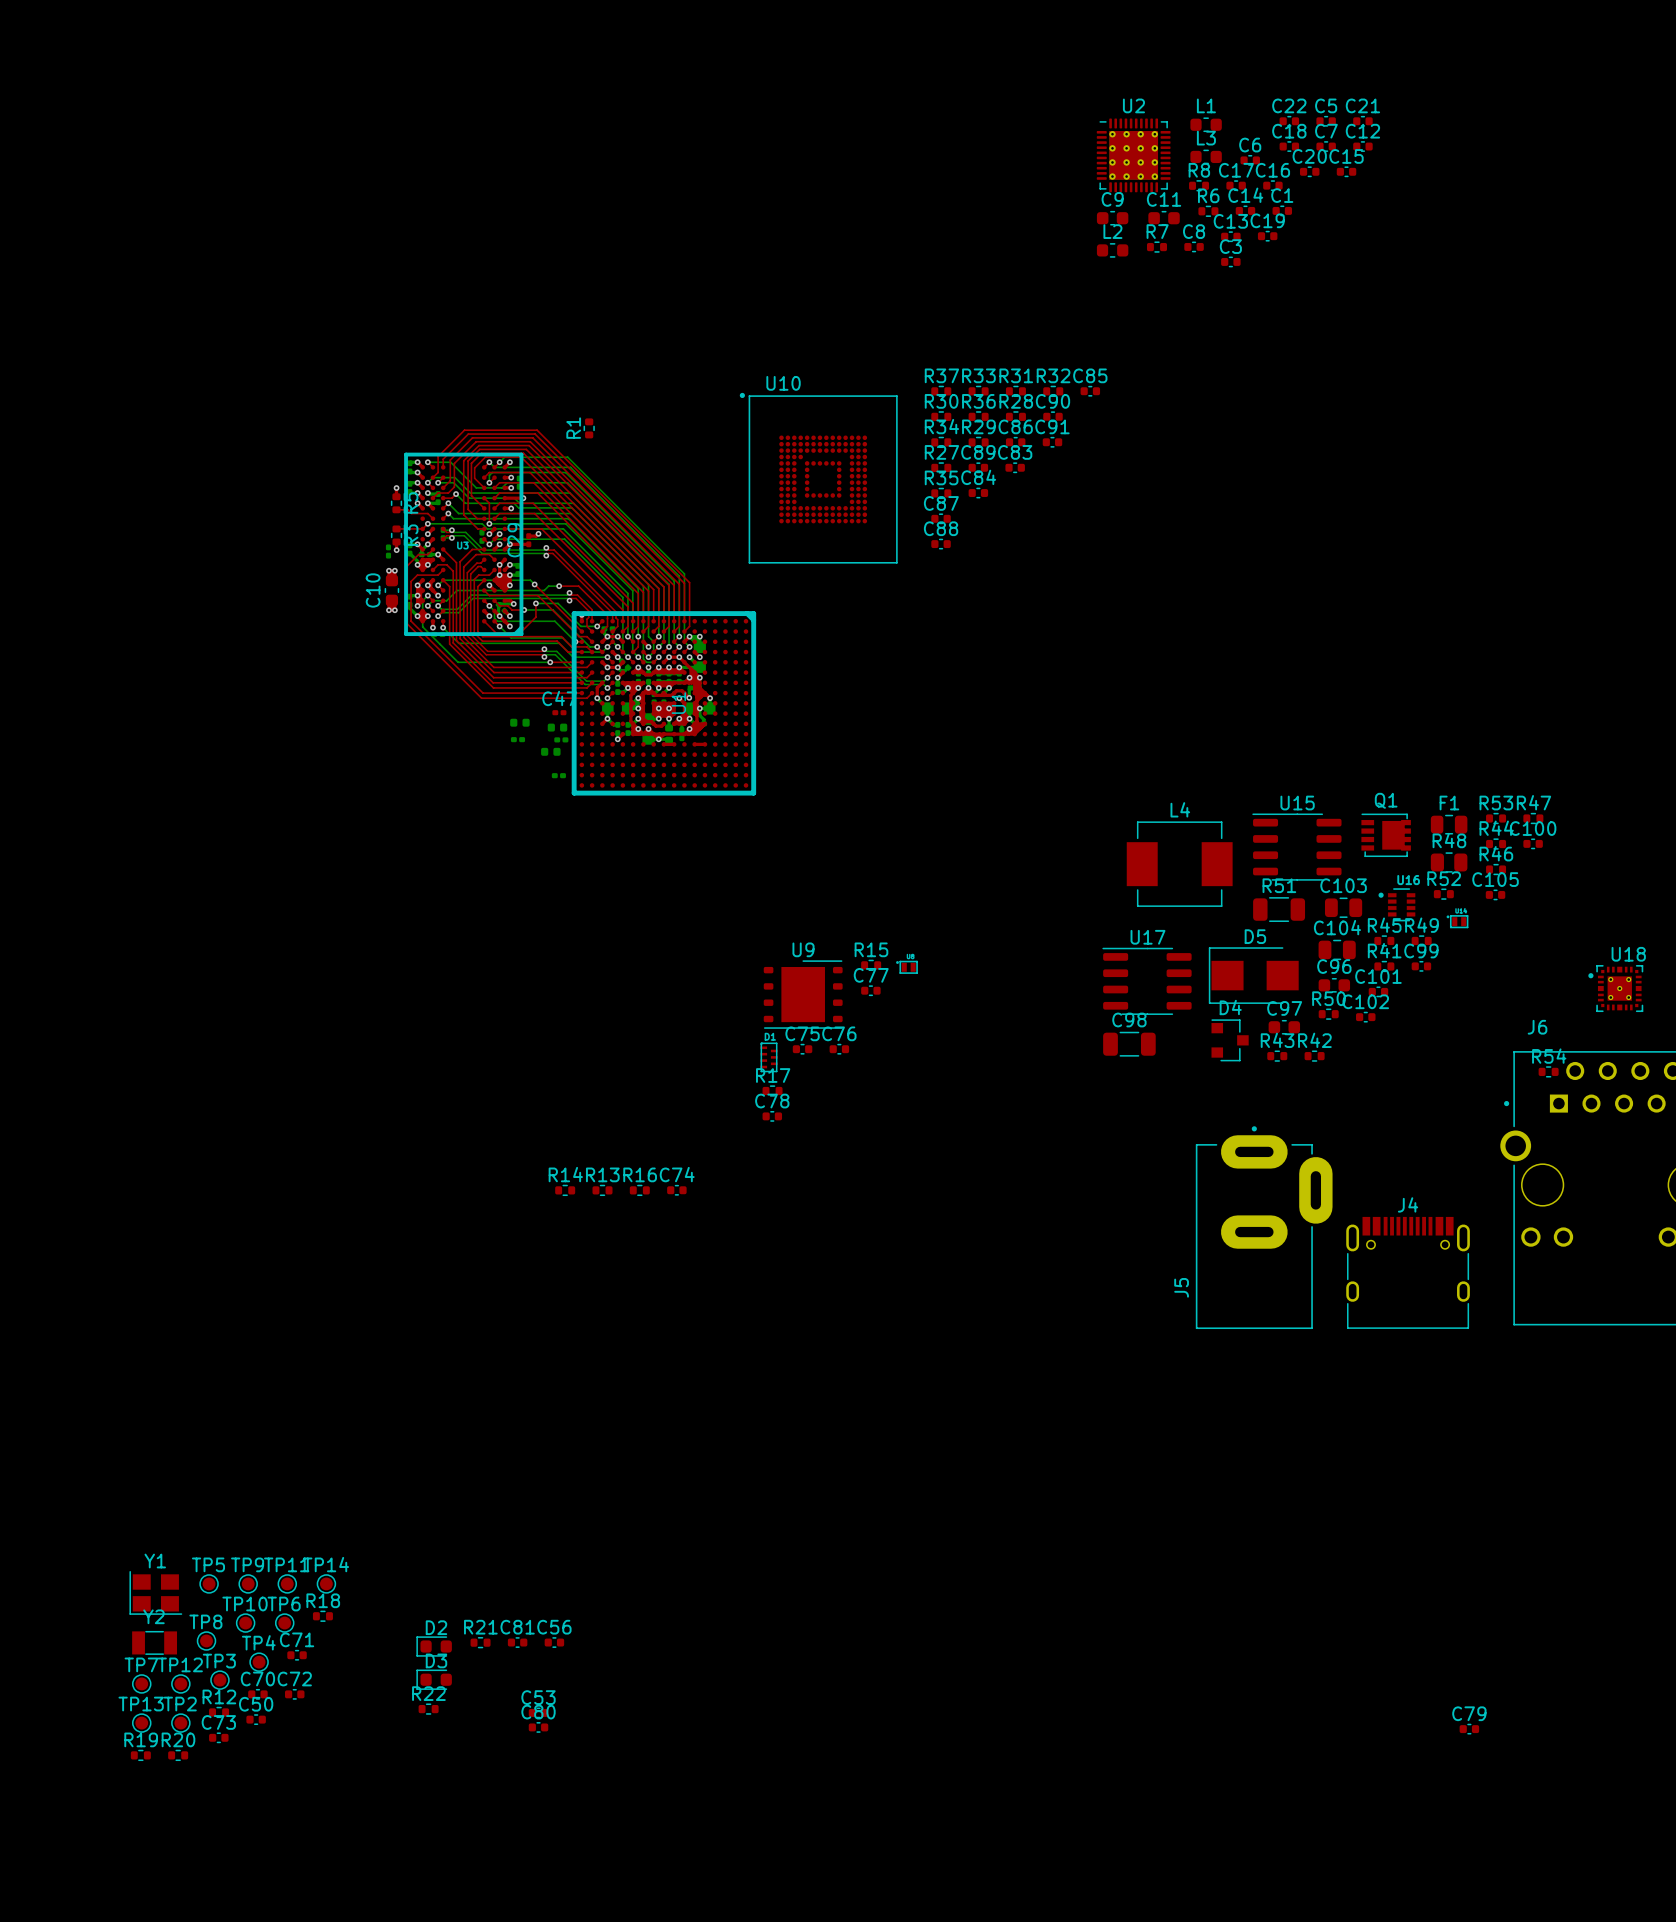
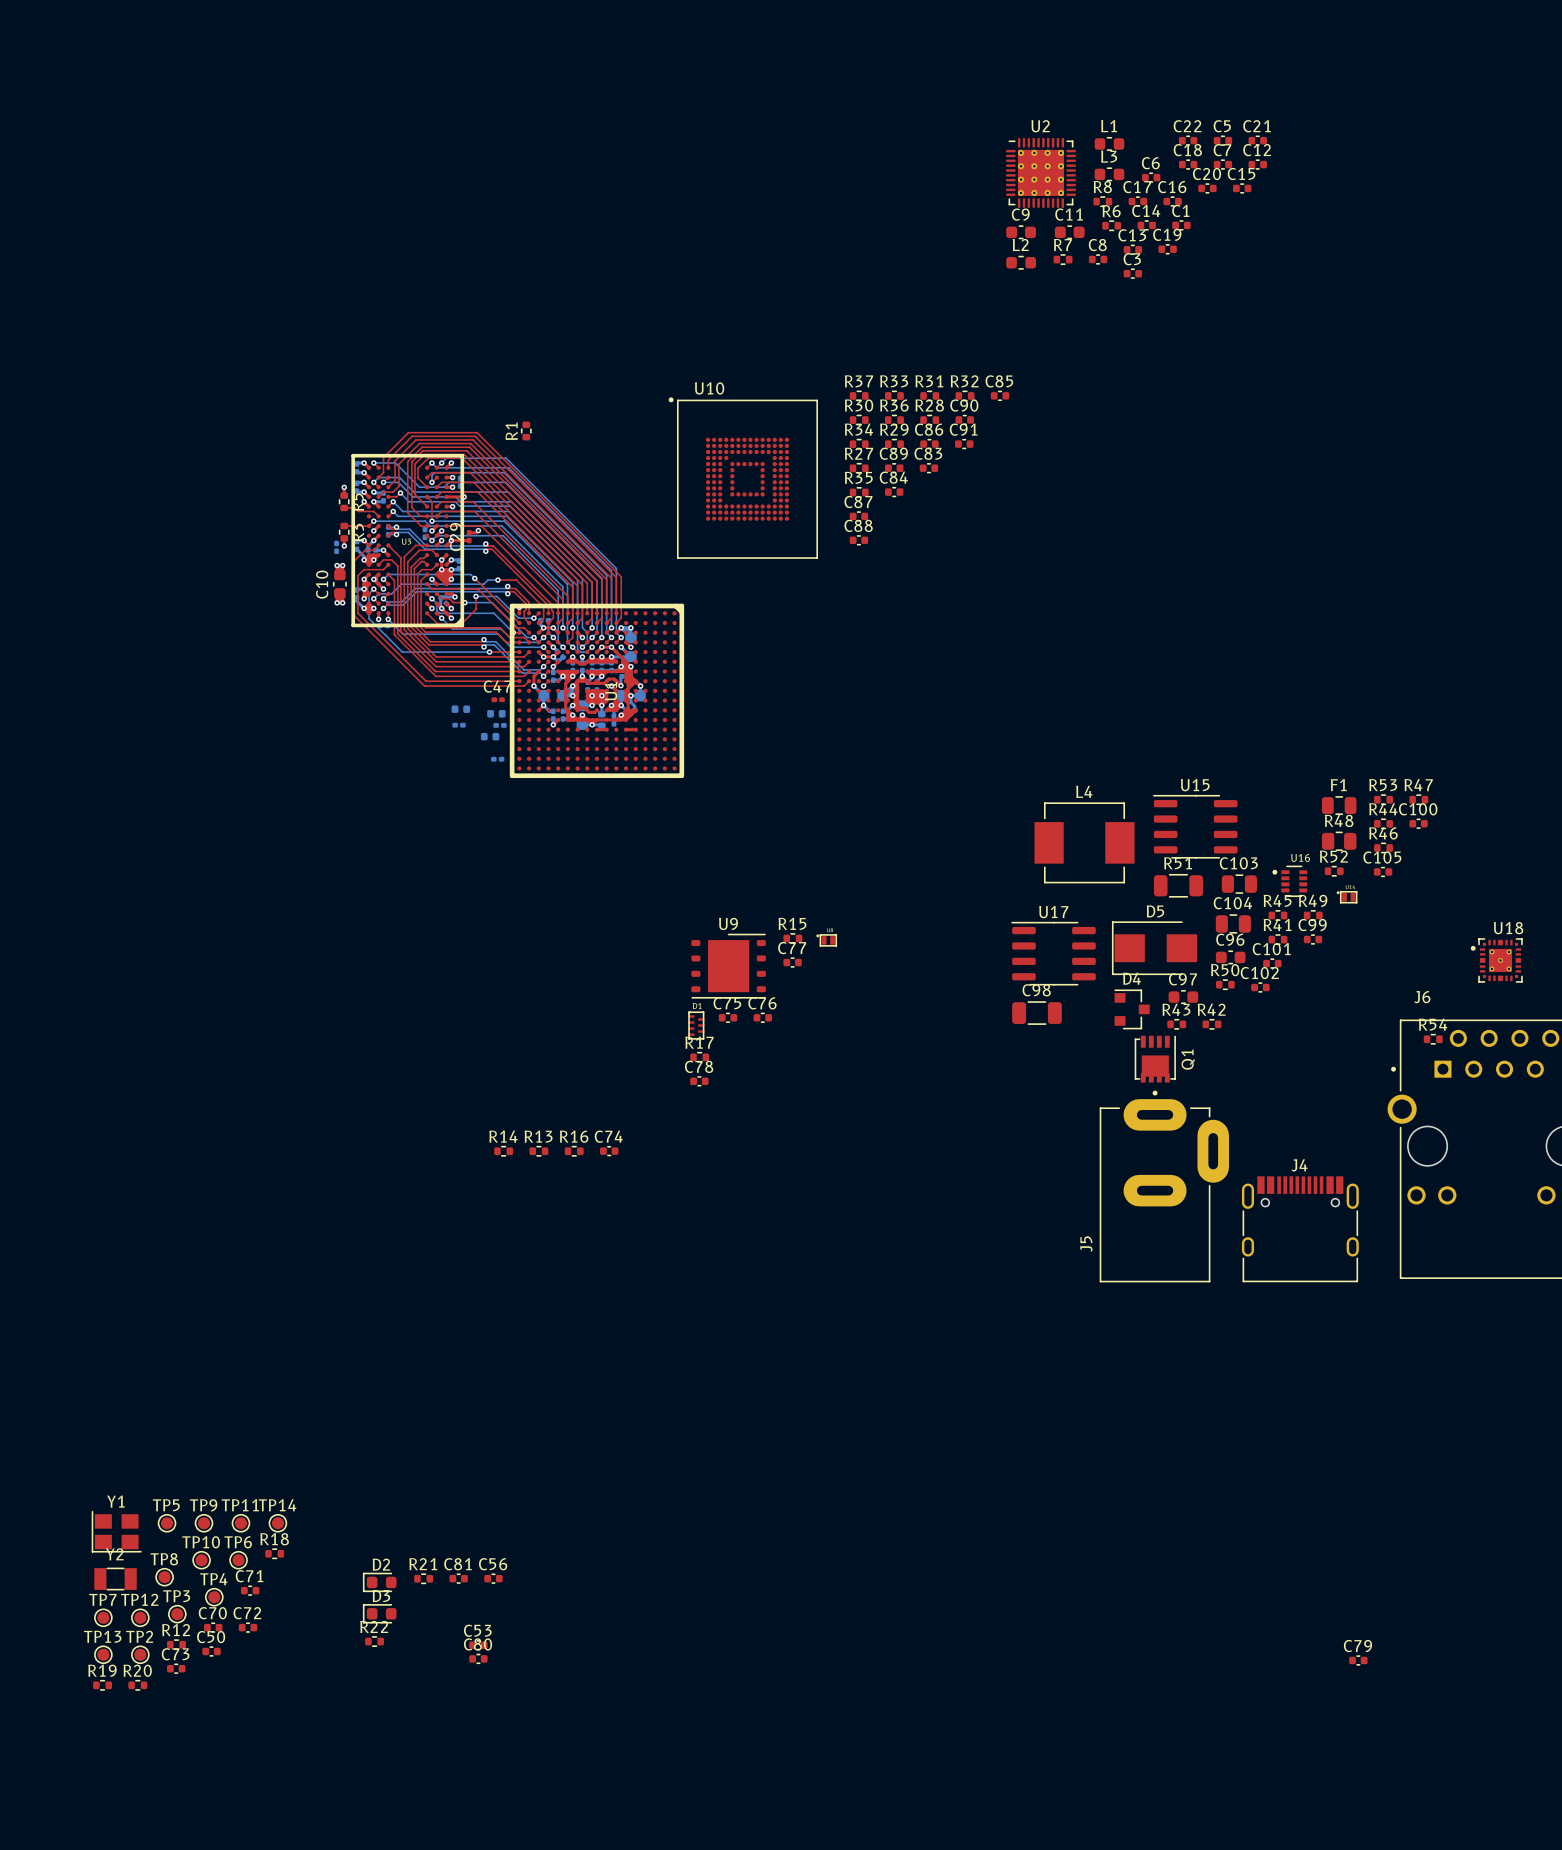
Q1 rotation: 0° (1386, 835) -> 90° clockwise (1155, 1059)
Q1 position: (1386, 835) -> (1155, 1059)

